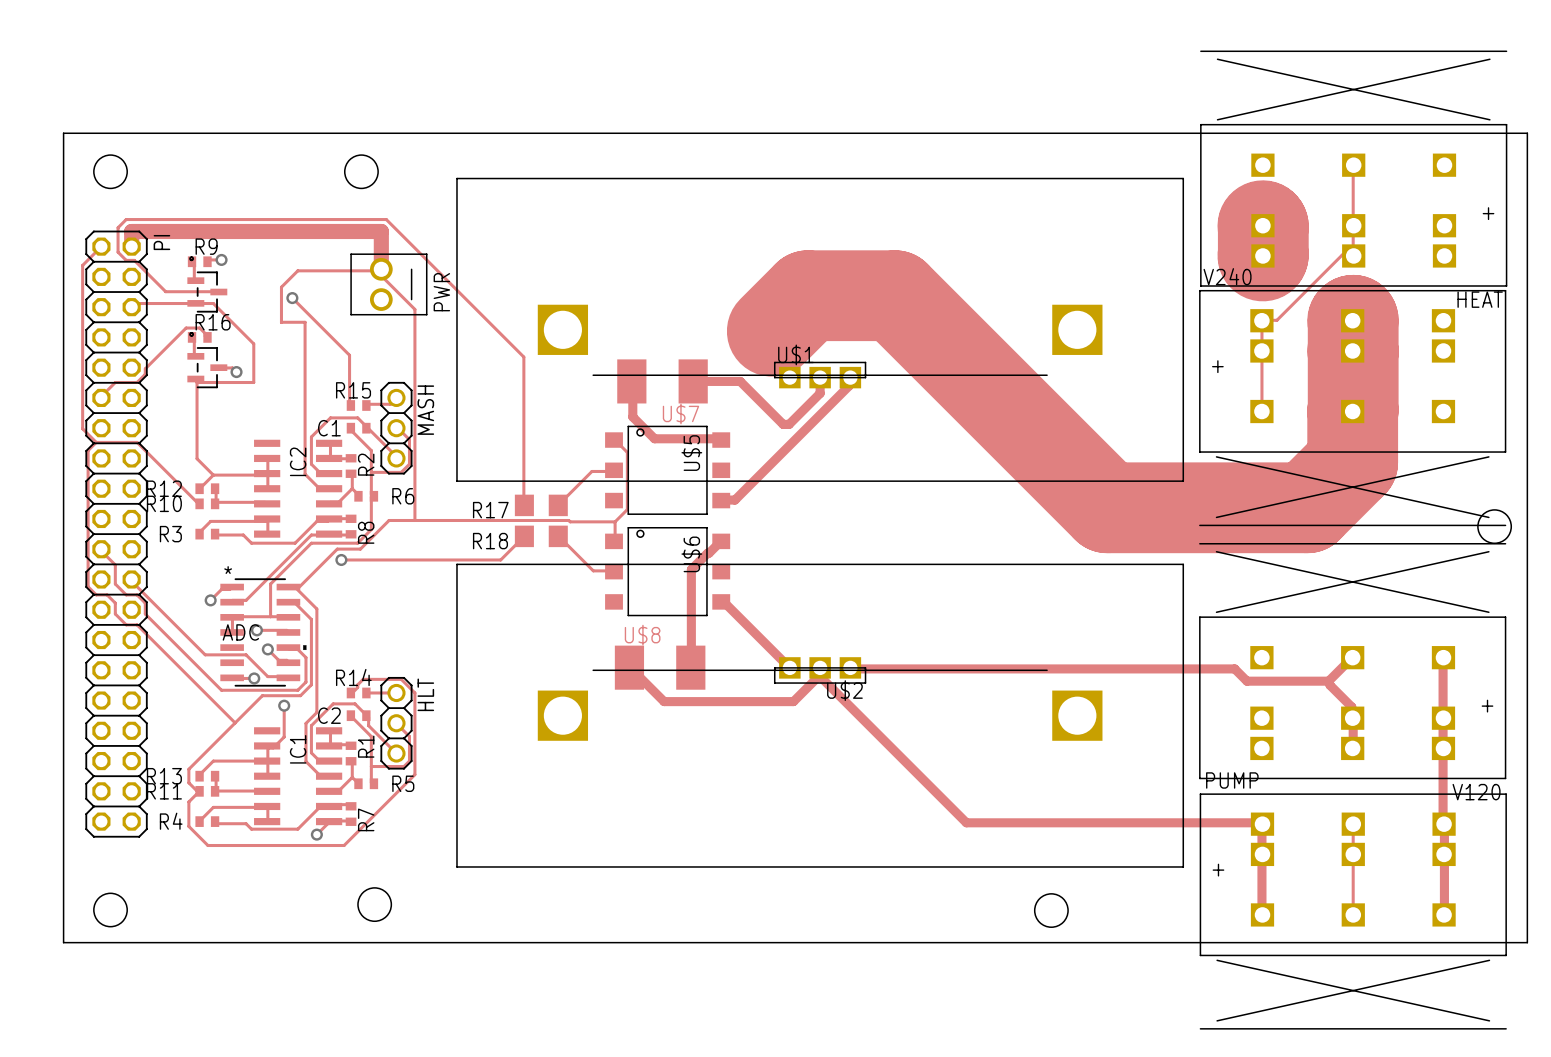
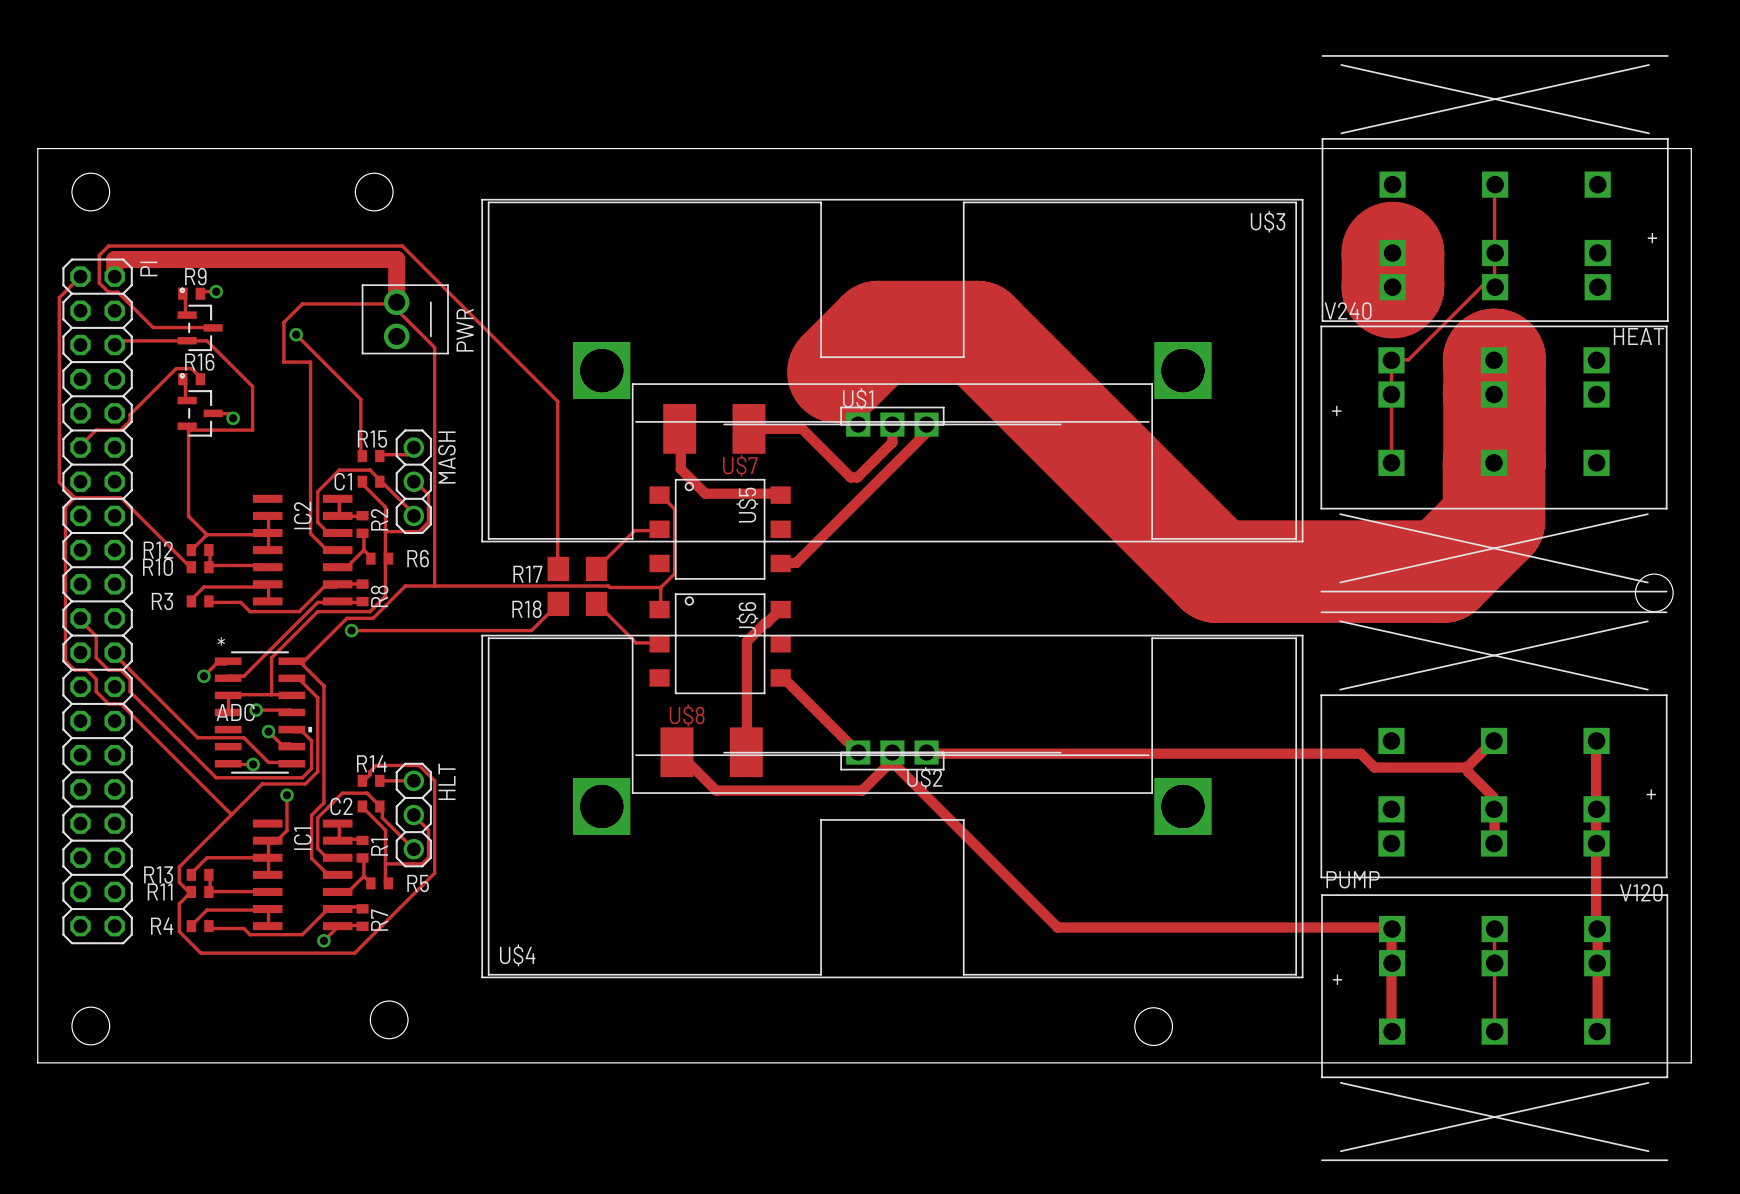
U$3: none -> (892, 370)
U$4: none -> (892, 806)

